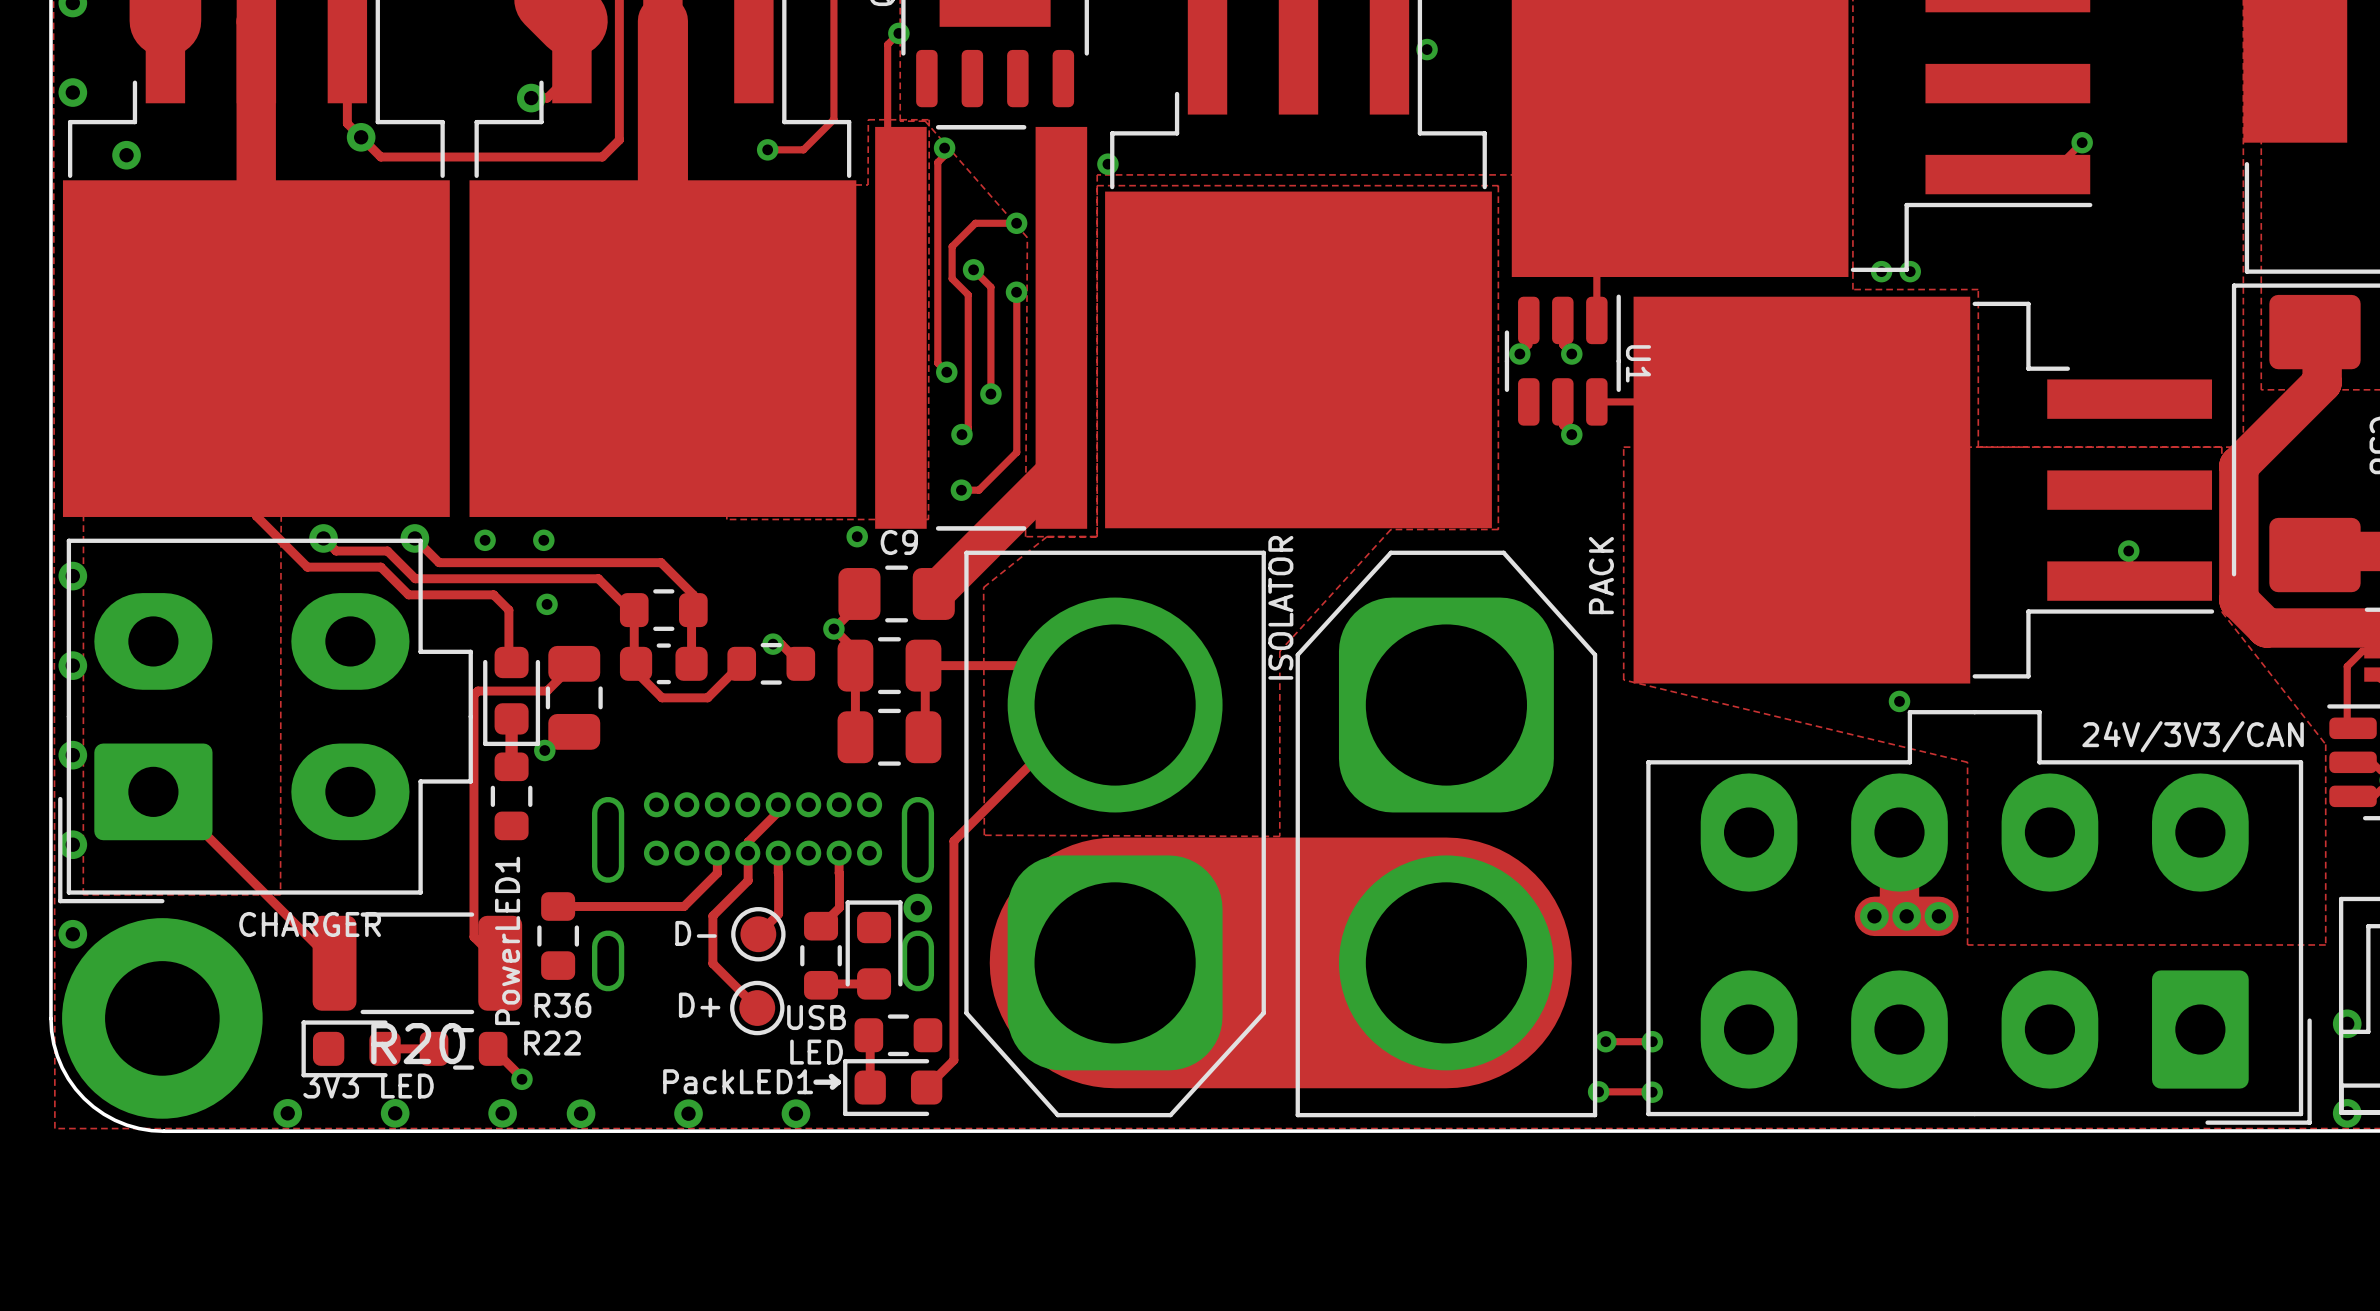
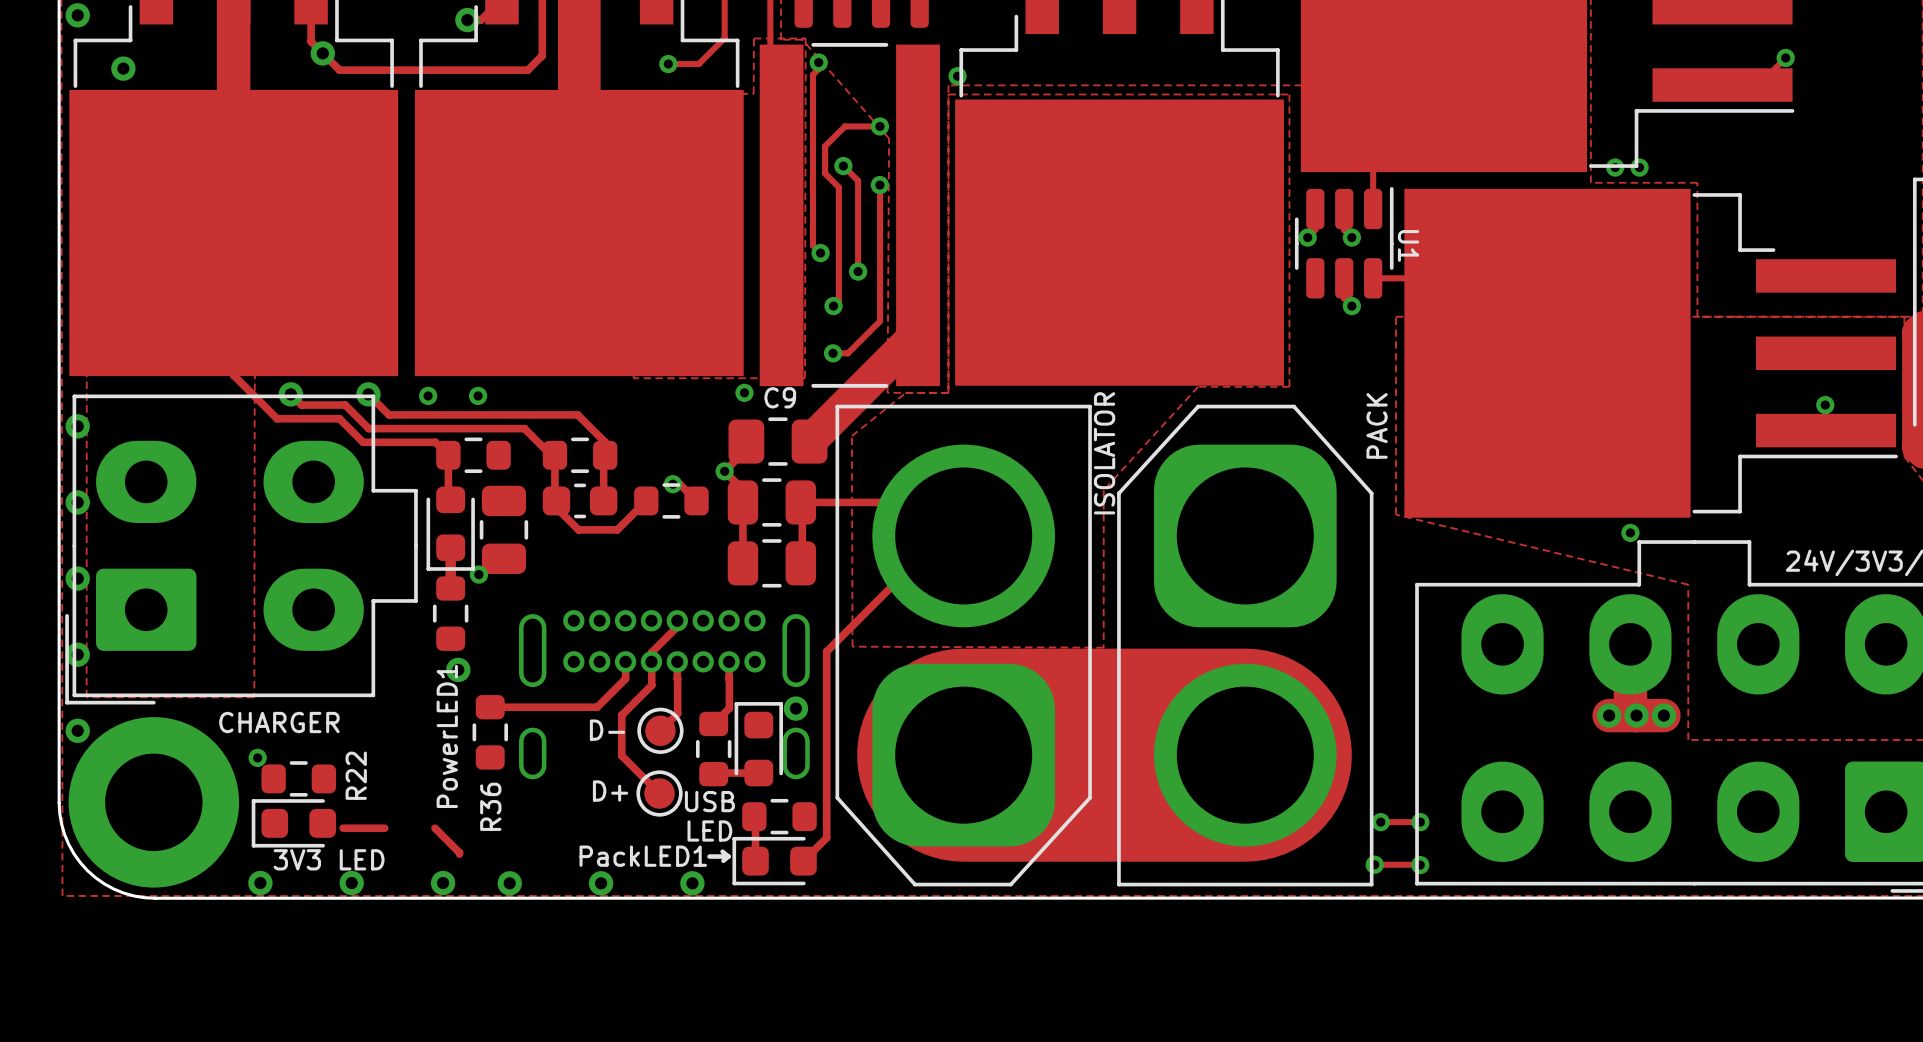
via: (547, 604) -> none
part: none -> (473, 455)
track: (574, 663) (547, 691) (477, 691) (473, 694) (473, 937) (500, 963) -> none
track: (153, 791) (163, 791) (334, 963) -> none
via: none -> (458, 669)
R20: (417, 963) -> none
via: none -> (257, 757)
R36 name rotation: 0° (562, 1005) -> 90° counterclockwise (490, 806)
R22 name rotation: 0° (552, 1043) -> 90° counterclockwise (356, 775)
part position: (351, 1048) -> (293, 823)
R22 position: (463, 1048) -> (298, 778)
via: (521, 1079) -> none

